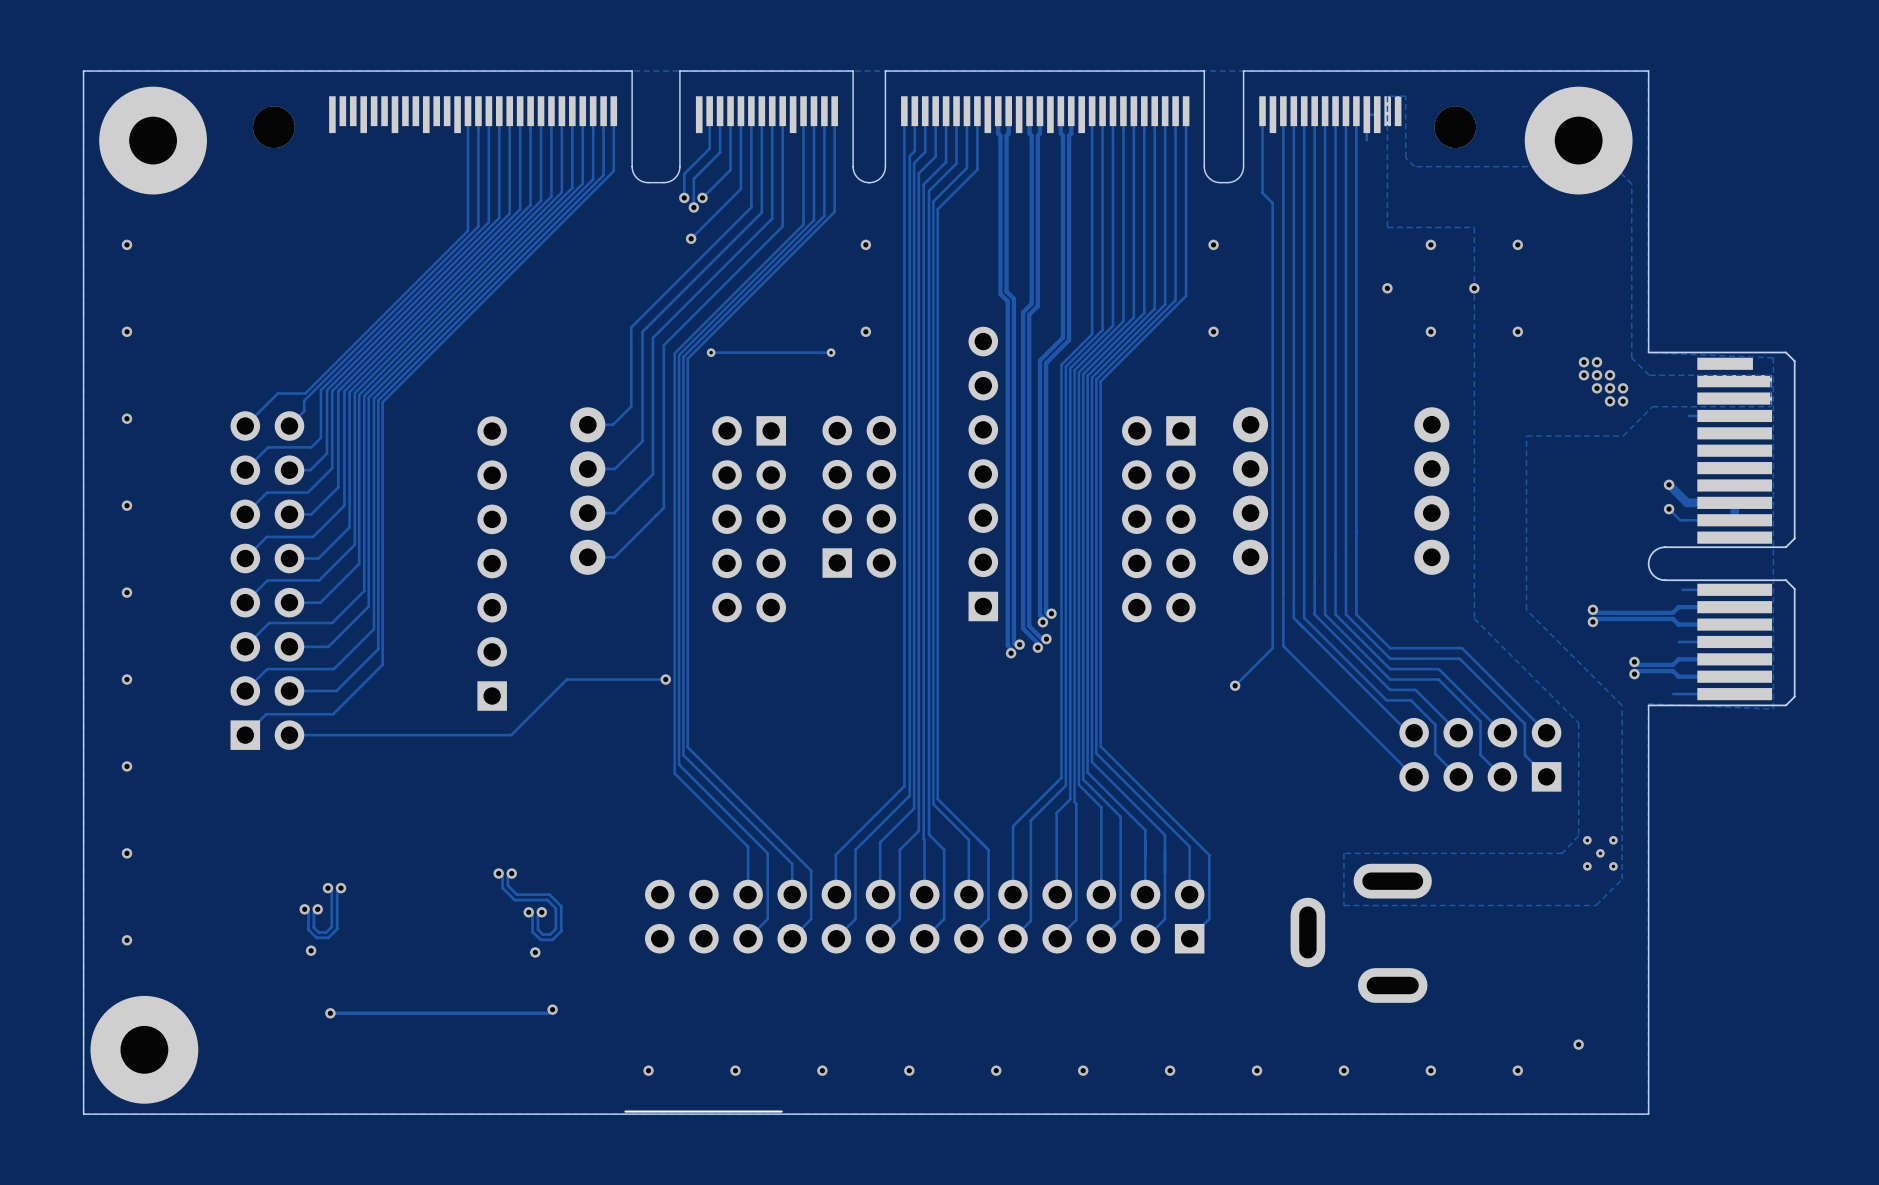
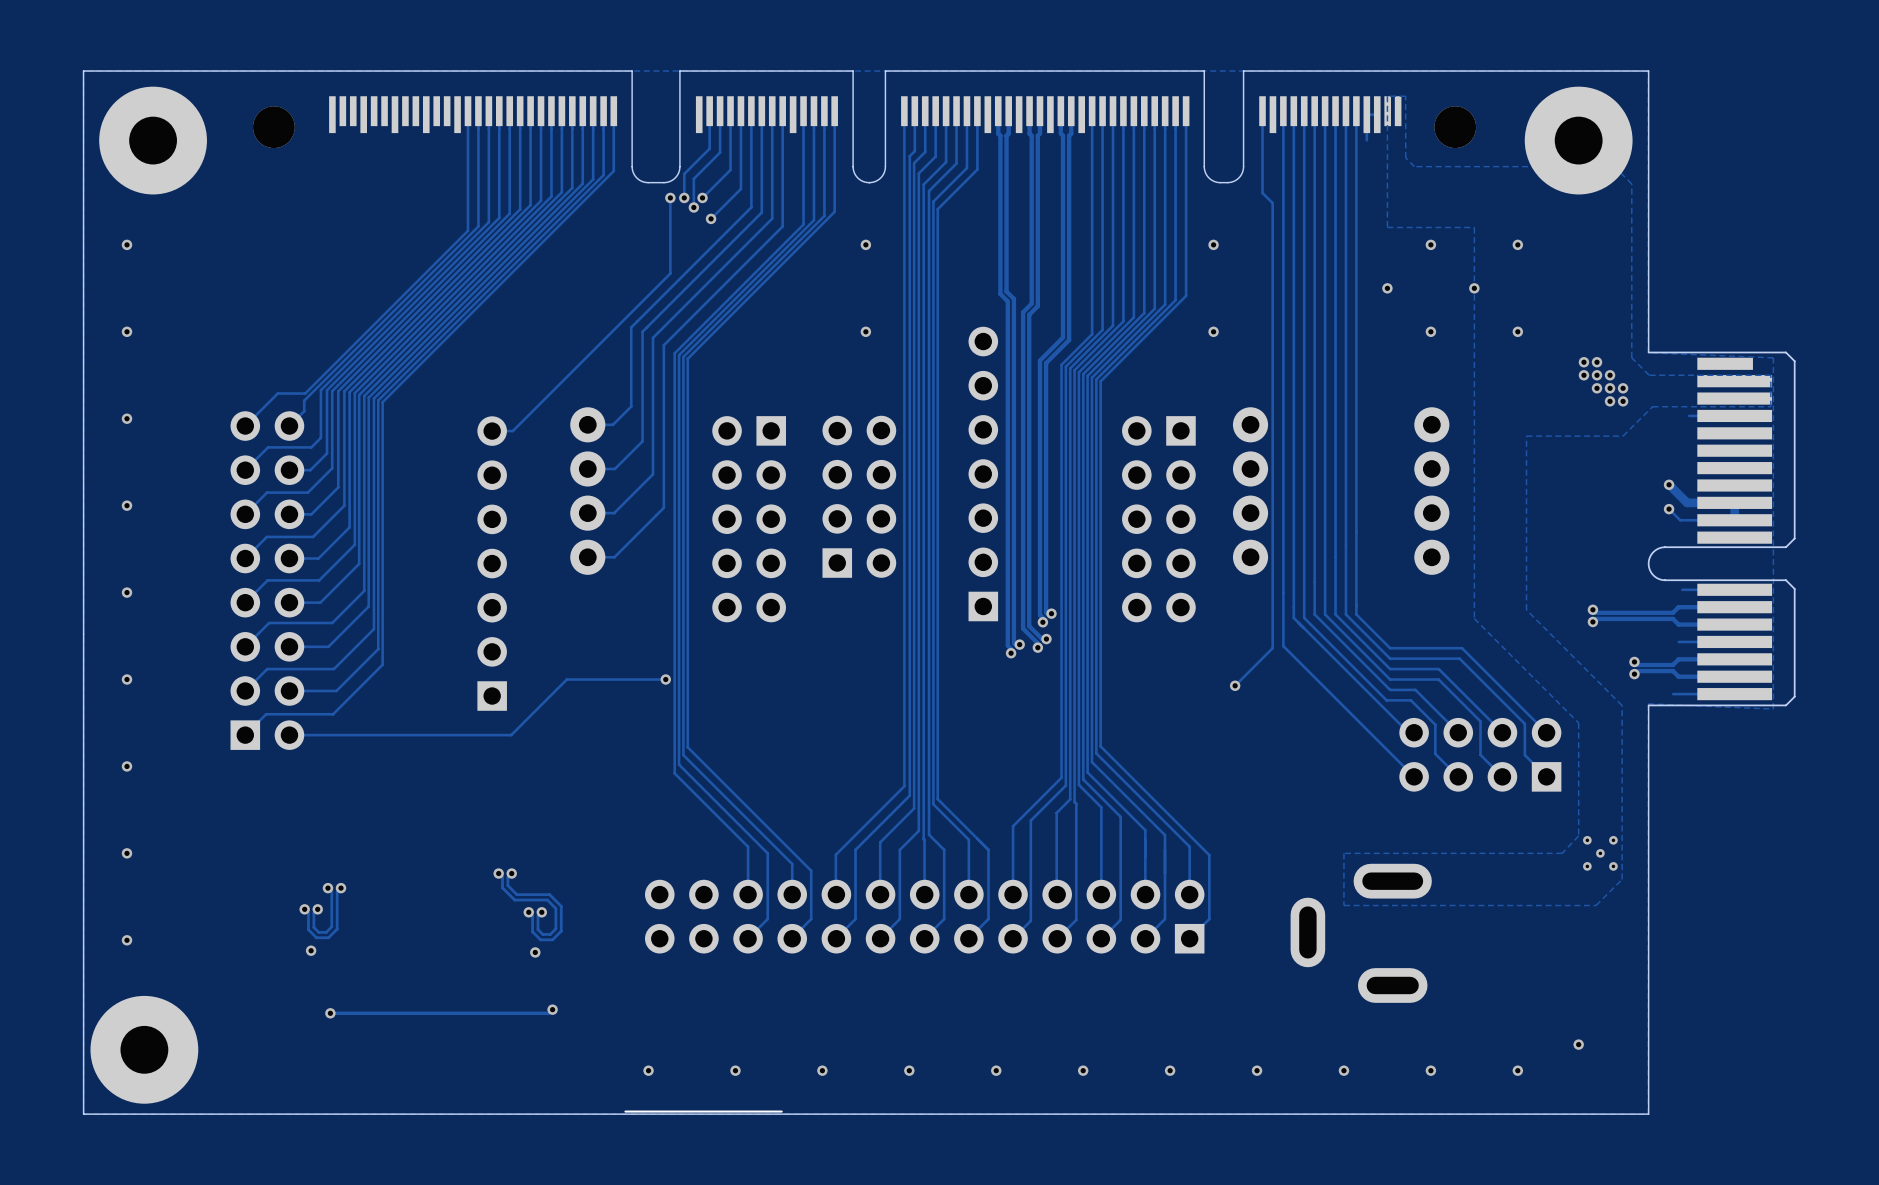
track: none -> (670, 197) (670, 273) (512, 431) (492, 431)
via: none -> (670, 197)
track: (711, 218) (691, 238) -> none
via: none -> (711, 218)
via: (691, 238) -> none
via: (711, 352) -> none
track: (831, 352) (711, 352) -> none
via: (831, 352) -> none

